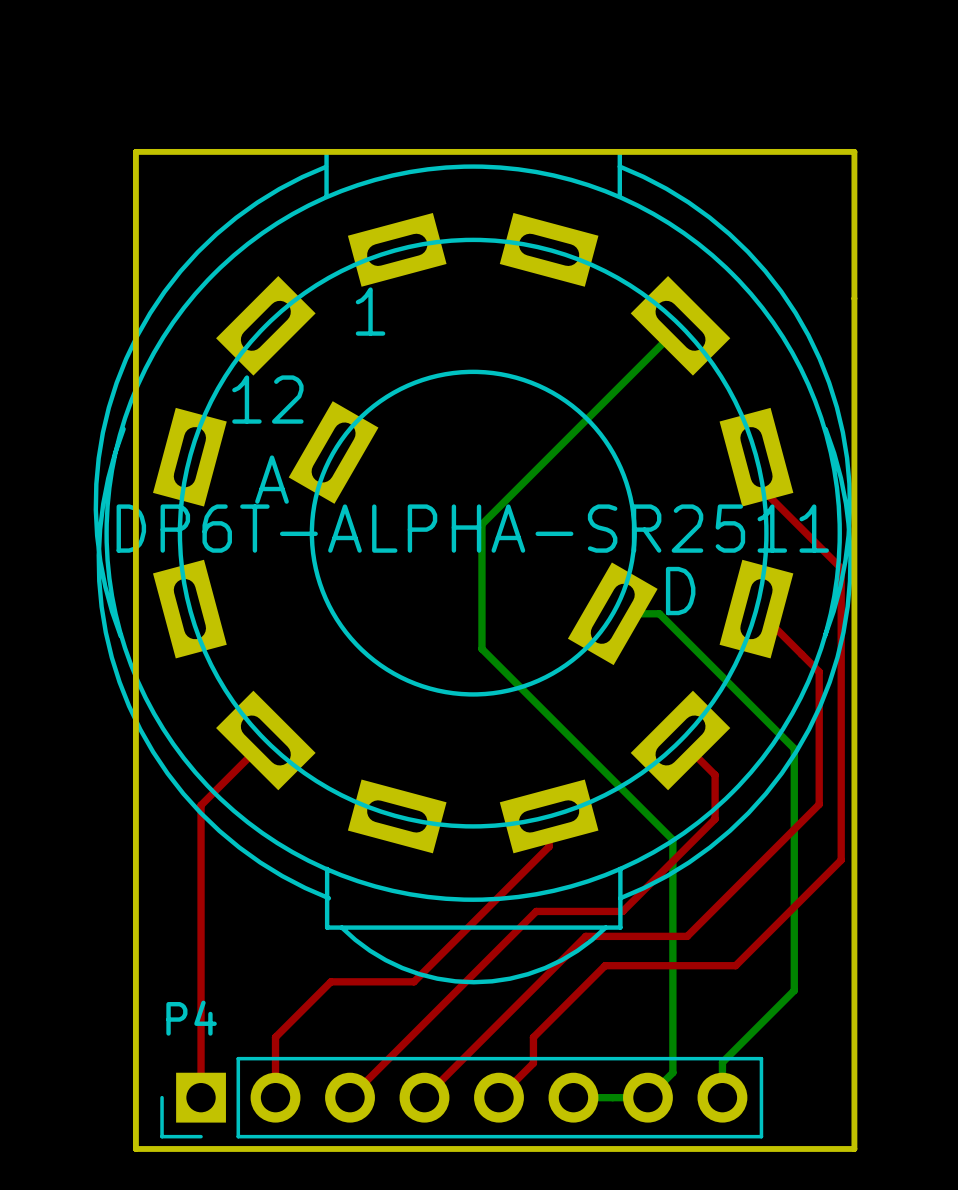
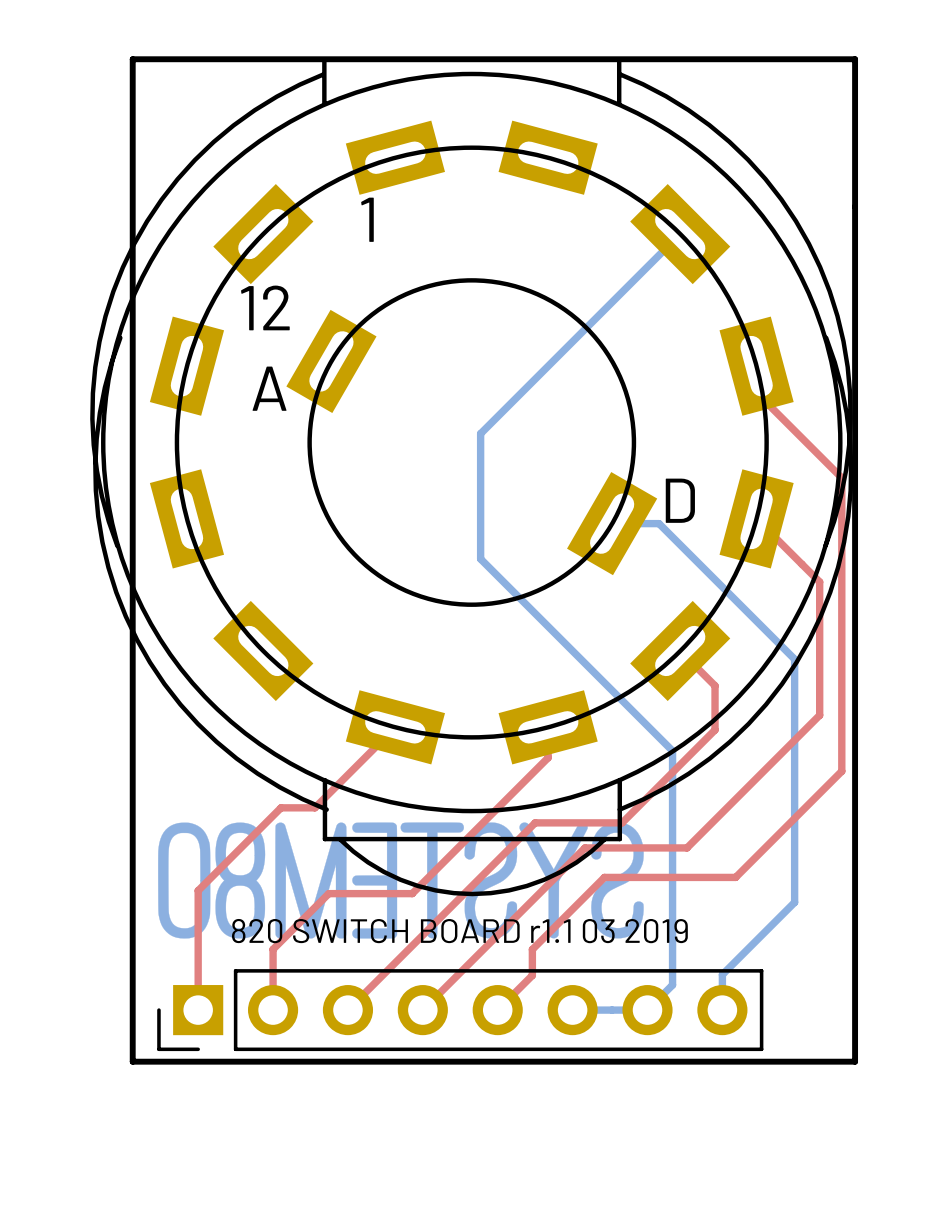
part value: DP6T-ALPHA-SR2511 (472, 528) -> none
top track: (265, 740) (201, 805) (201, 978) -> (395, 727) (314, 807) (281, 807) (198, 890)
drawing: none -> [158, 822, 644, 939]
P4 name: P4 (191, 1018) -> none
text: none -> 820 SWITCH BOARD r1.1 03 2019 (459, 931)

